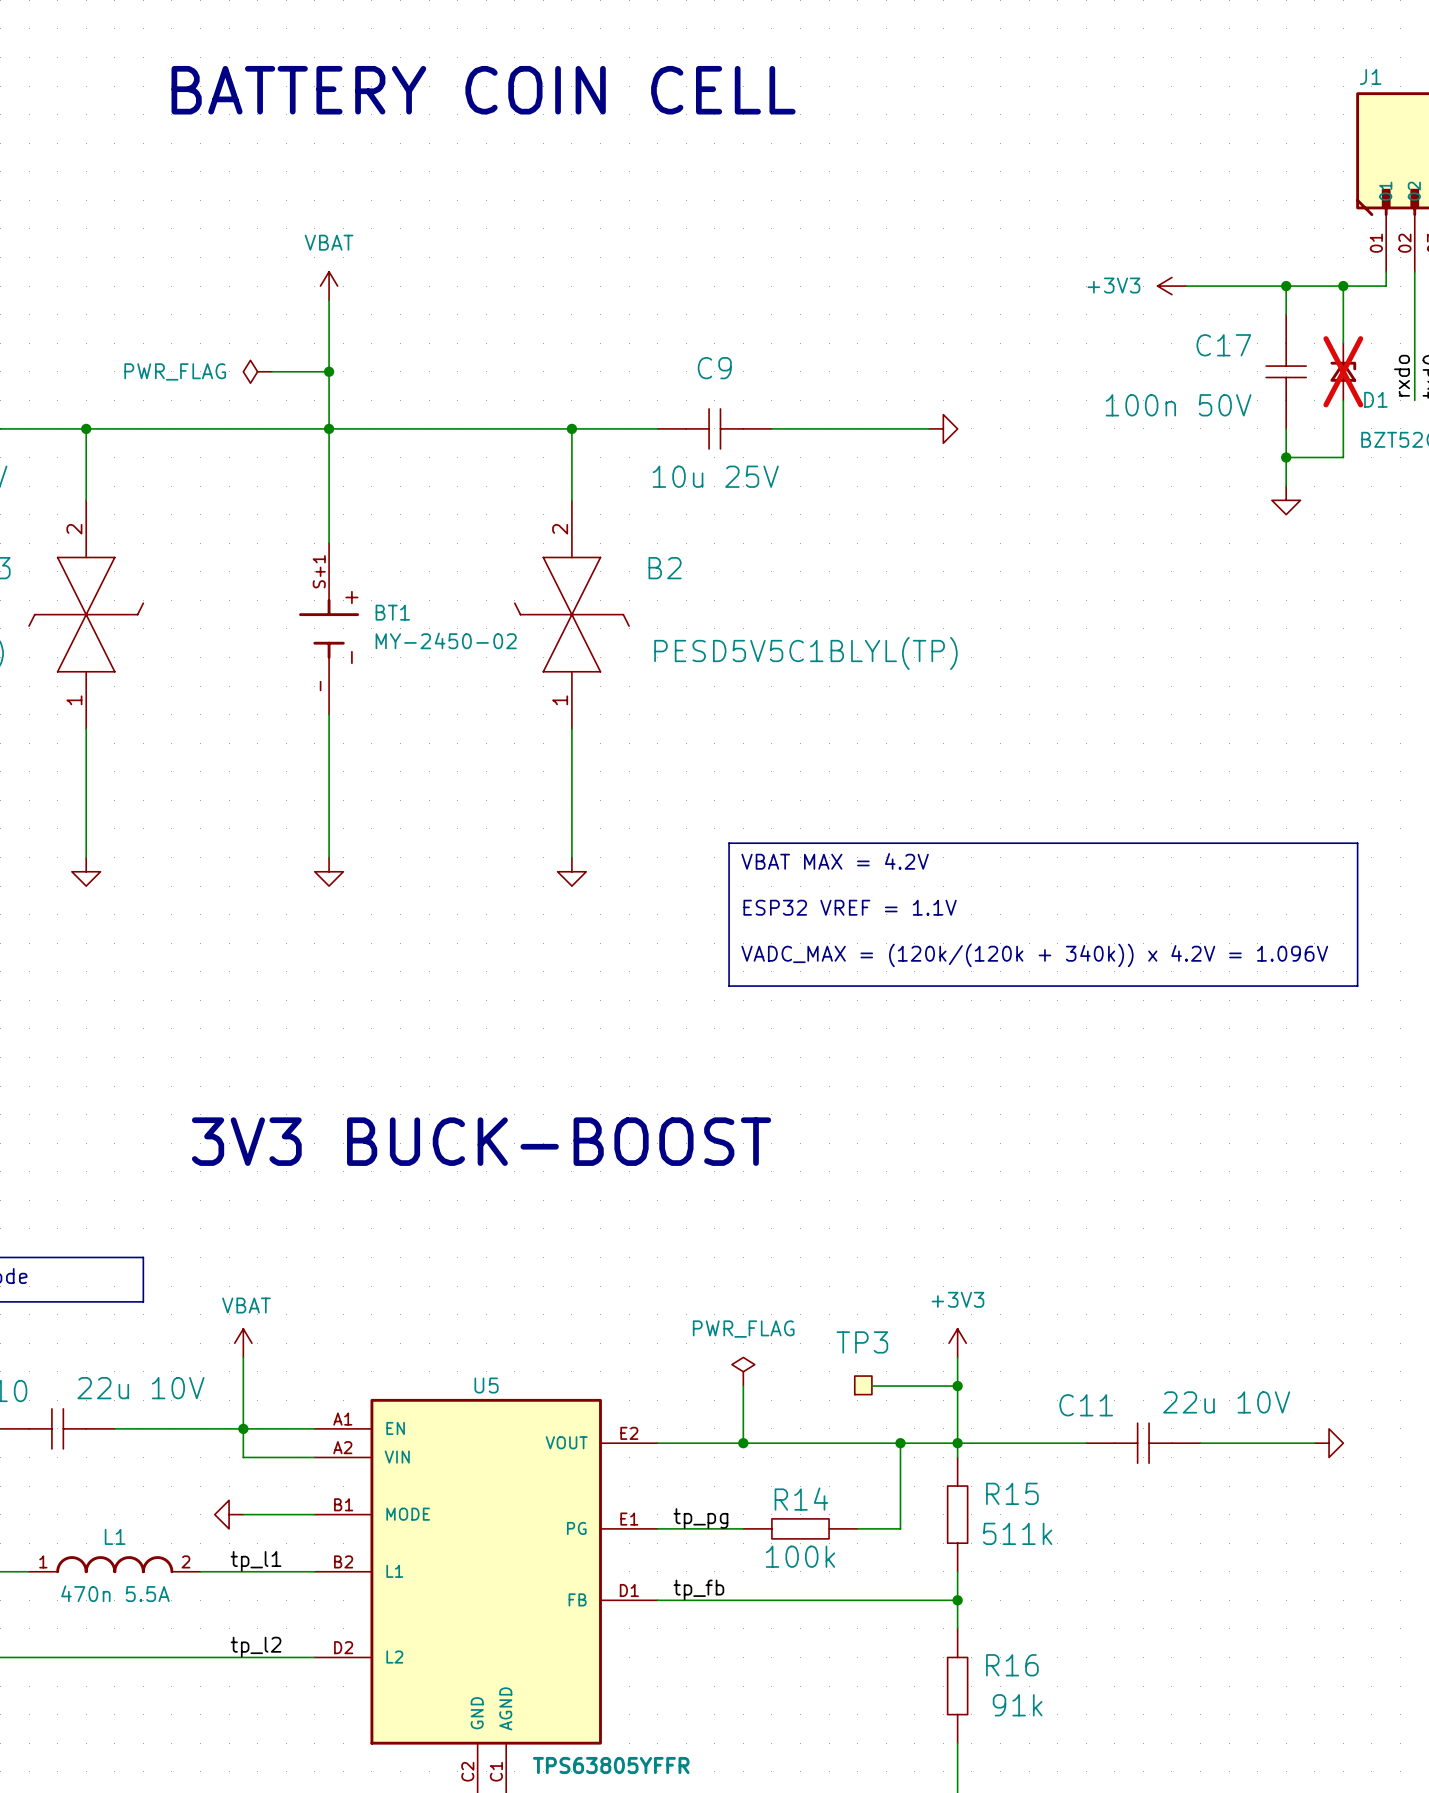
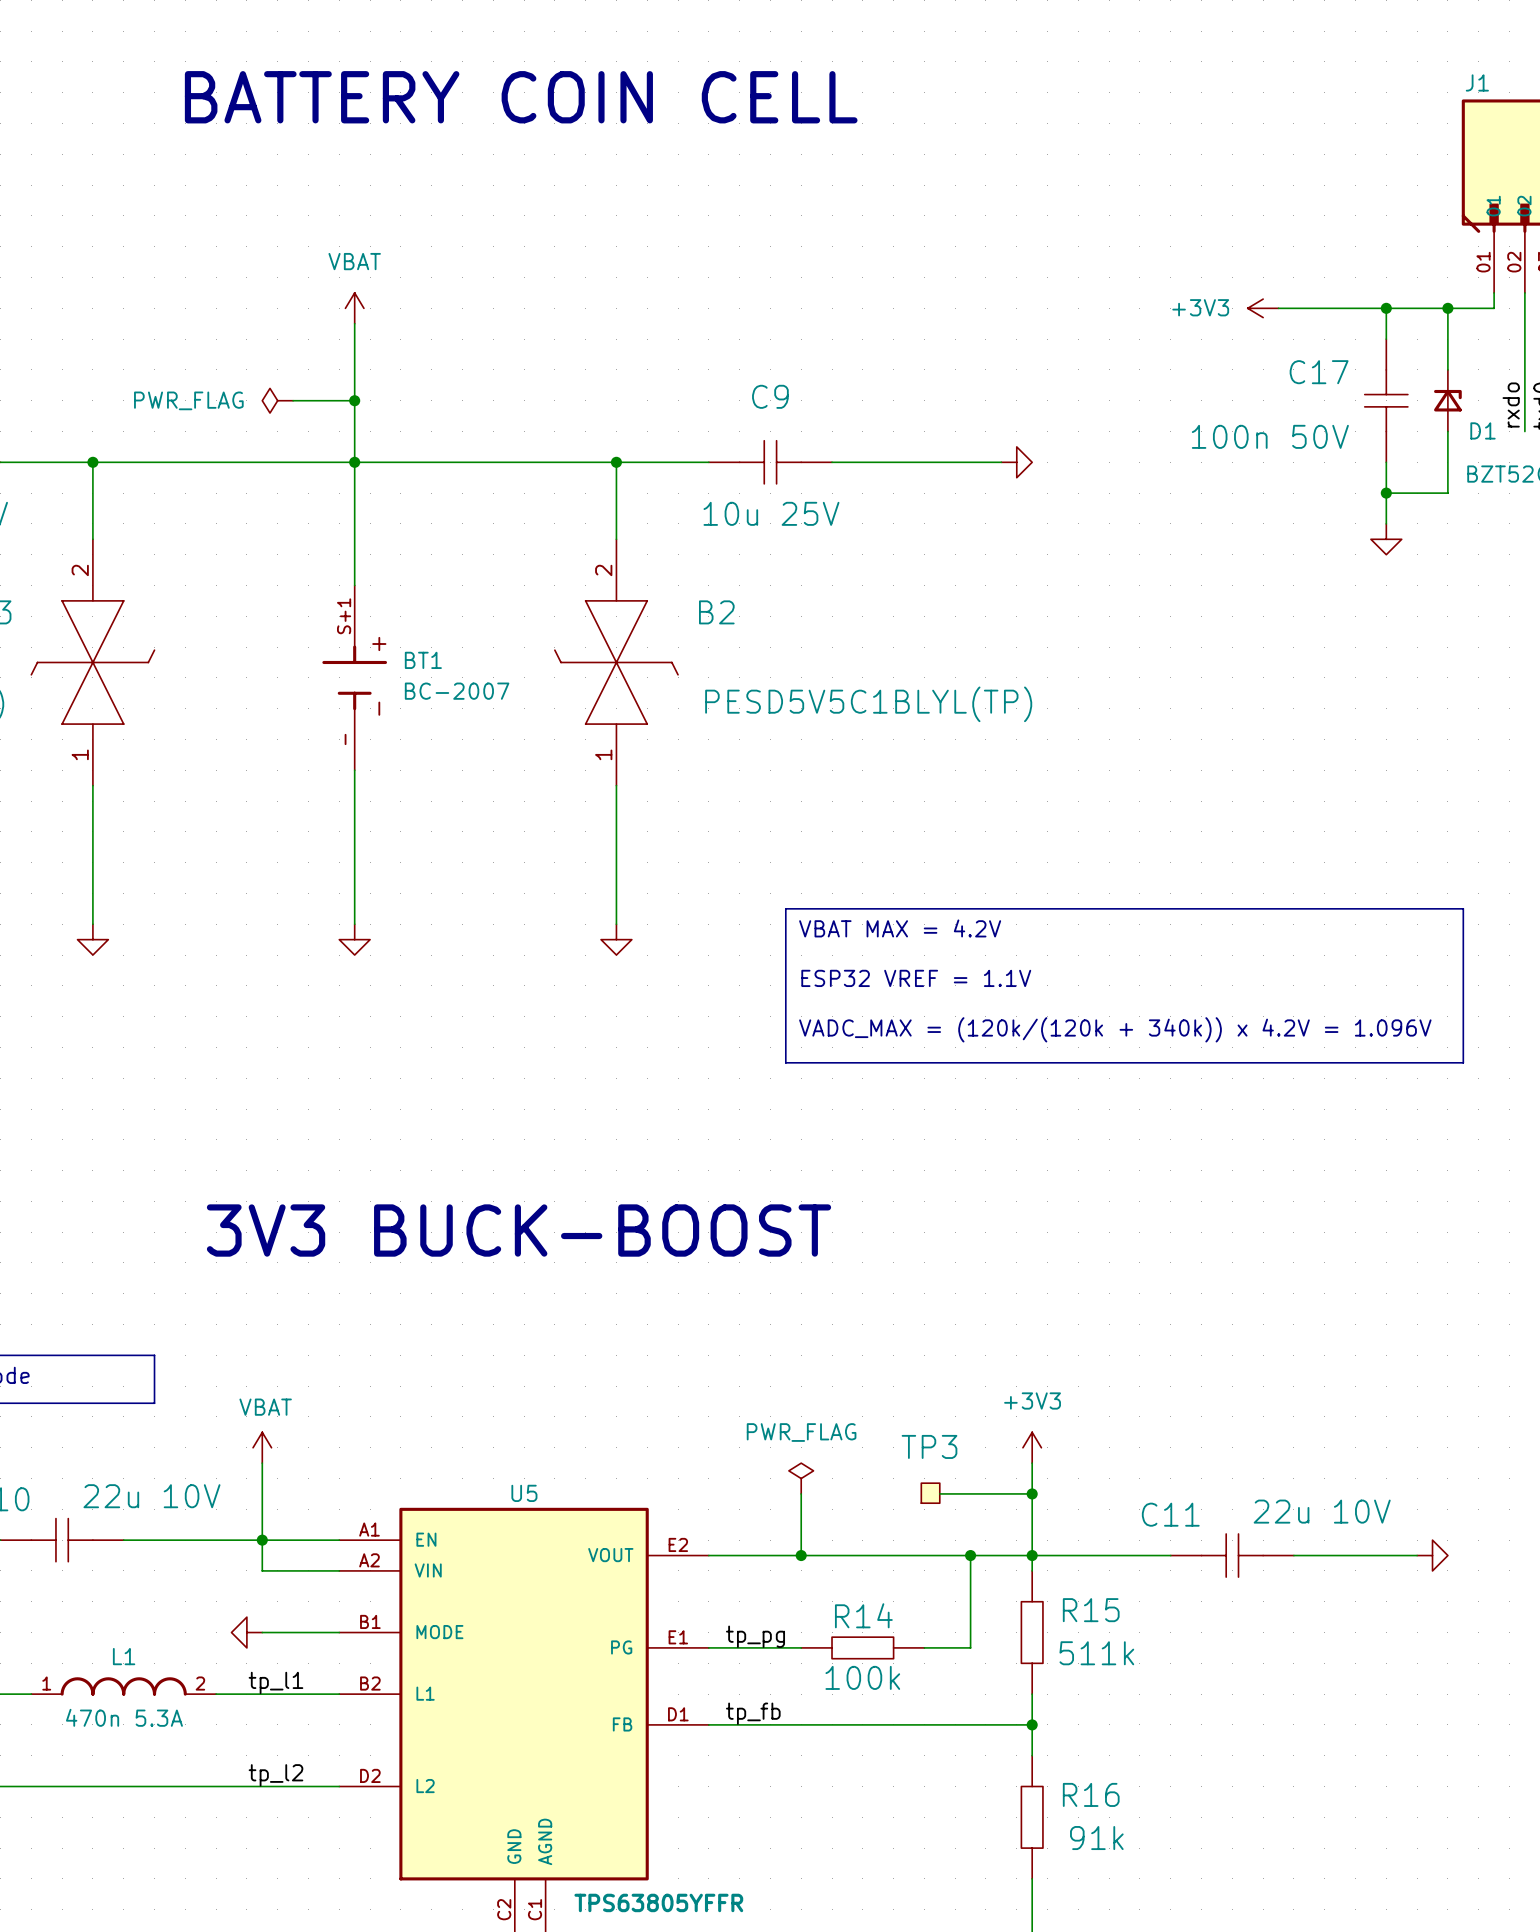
D1 do-not-place cross: (1343, 371) -> none
BT1 value: MY-2450-02 (446, 640) -> BC-2007 (457, 691)
L1 value: 470n 5.5A (115, 1593) -> 470n 5.3A (124, 1717)

